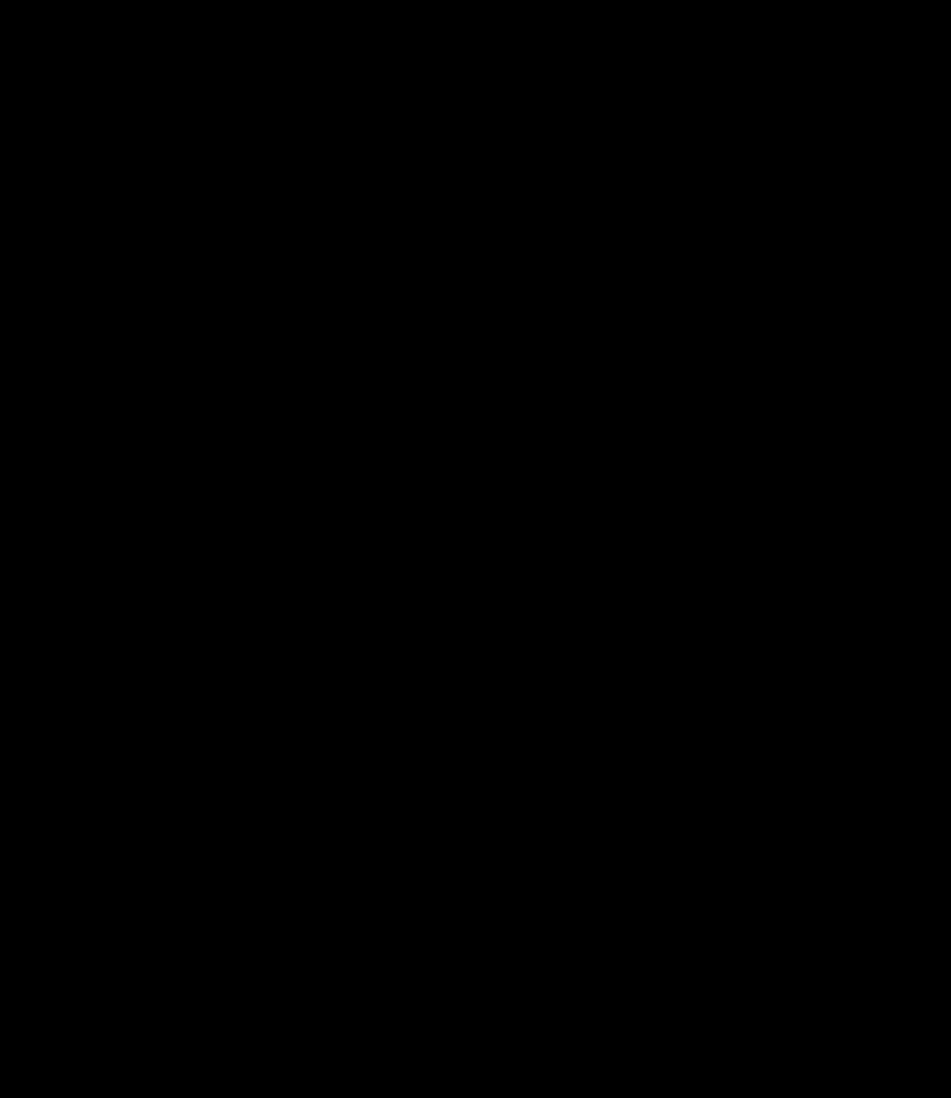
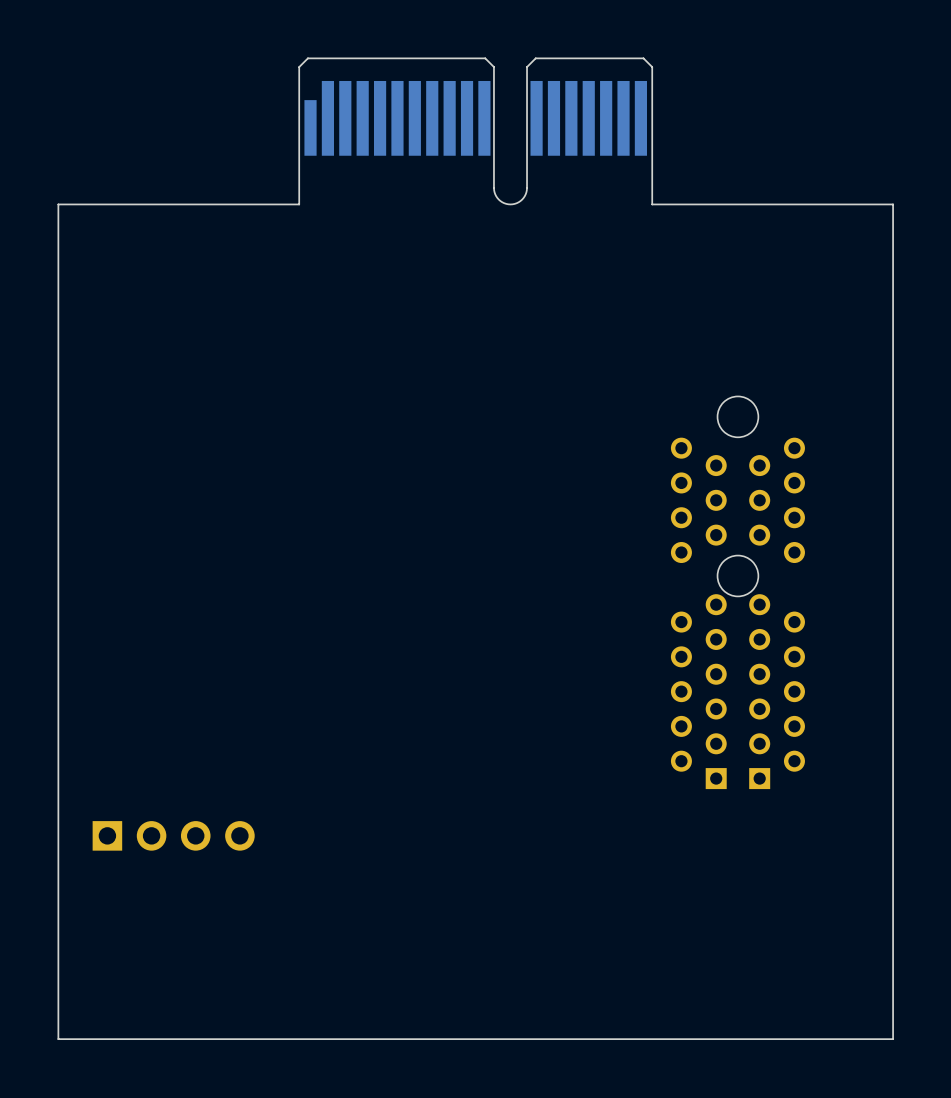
part: none -> (475, 131)
board edge: none -> (652, 204) (893, 204) (893, 1039) (58, 1039) (58, 204) (299, 204)
part: none -> (737, 592)
part: none -> (173, 835)

